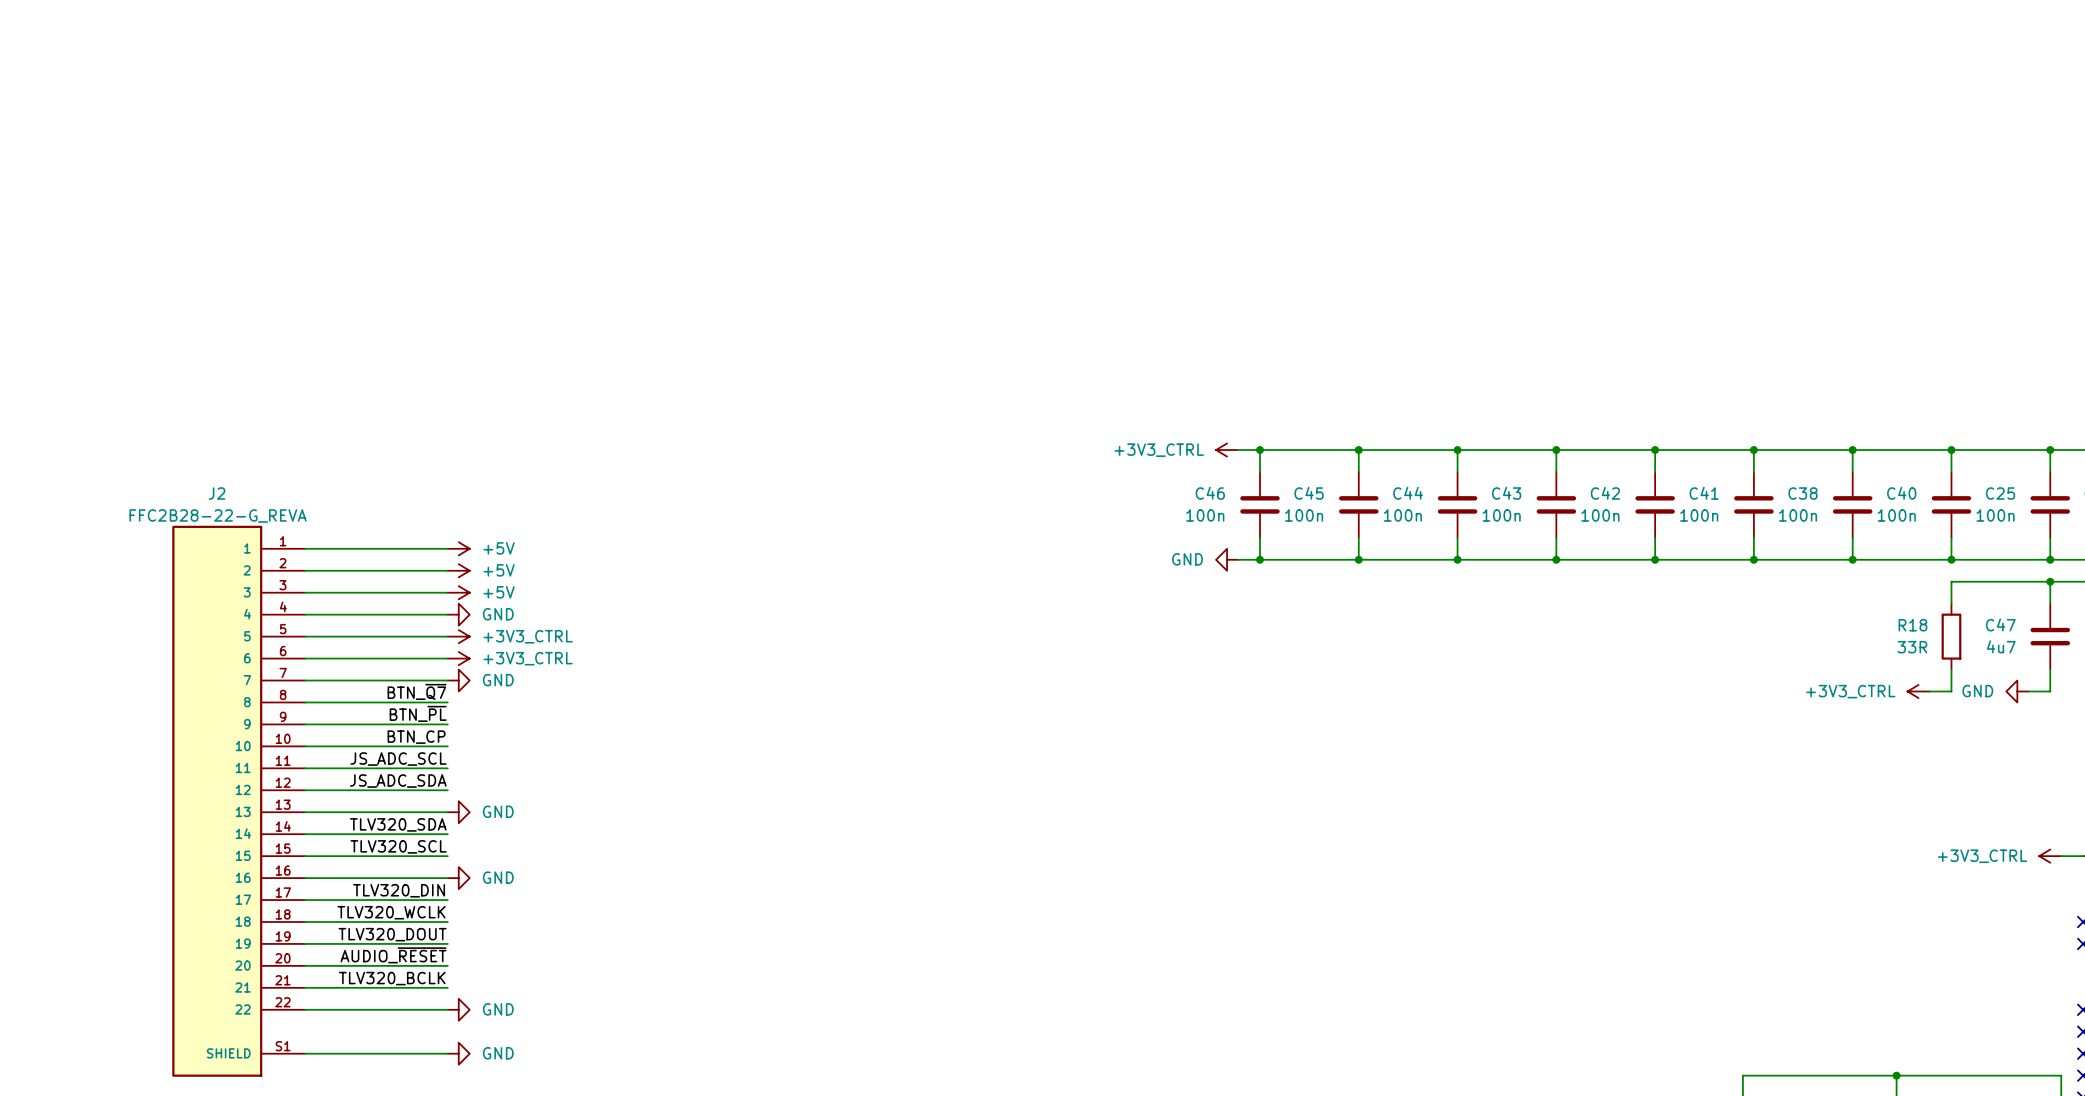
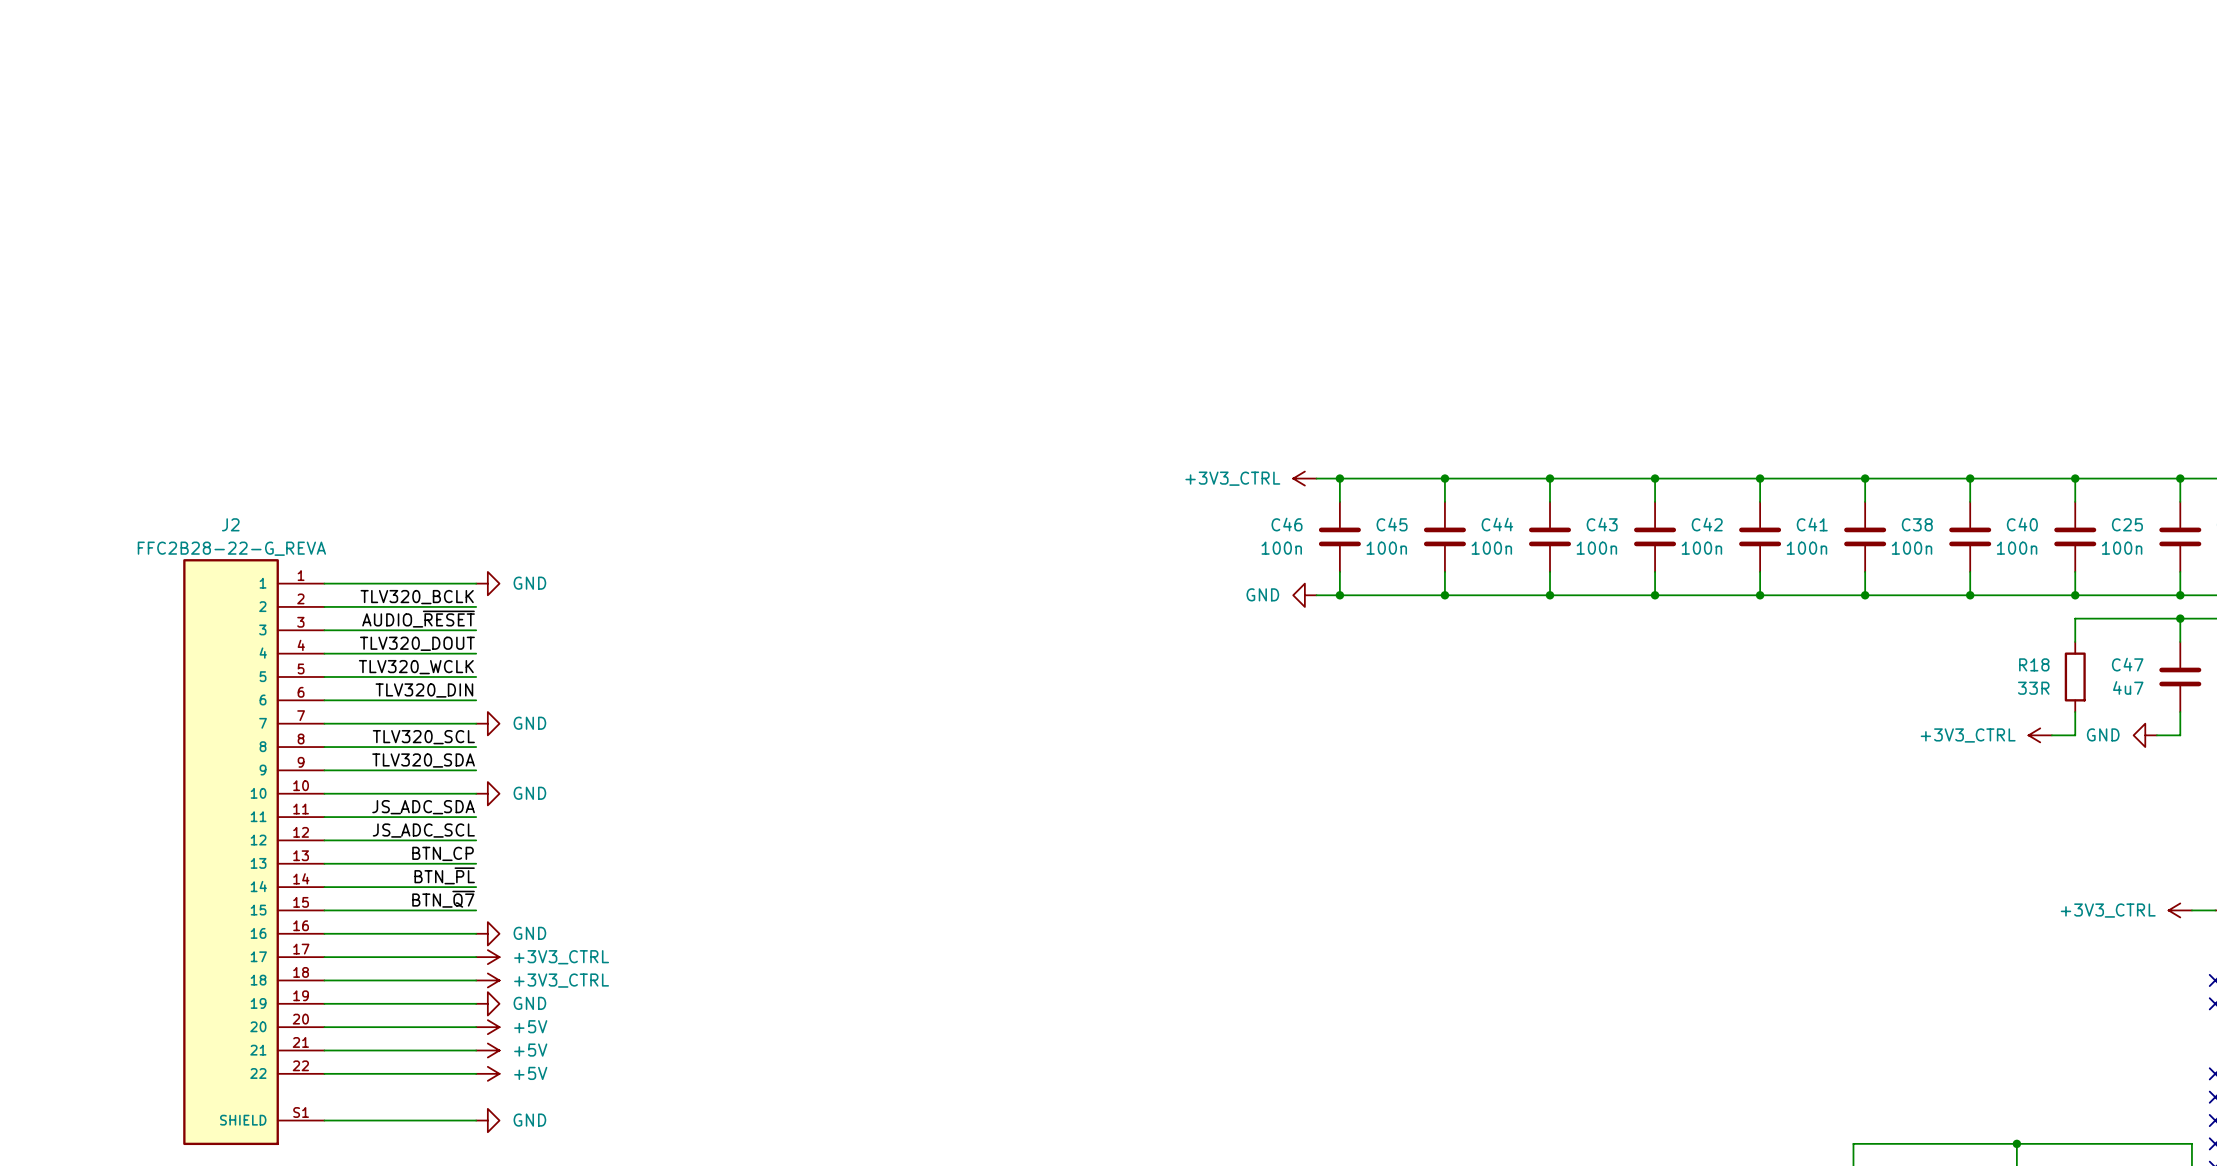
power symbol: +5V (458, 548) -> GND (487, 583)
label: none -> TLV320_BCLK (417, 597)
power symbol: +5V (458, 570) -> none
label: none -> AUDIO_~{RESET} (418, 619)
power symbol: +5V (458, 592) -> none
label: none -> TLV320_DOUT (417, 643)
power symbol: GND (458, 614) -> none
label: none -> TLV320_WCLK (416, 667)
power symbol: +3V3_CTRL (458, 636) -> none
label: none -> TLV320_DIN (424, 690)
power symbol: +3V3_CTRL (458, 658) -> none
label: BTN_~{Q7} (417, 691) -> TLV320_SCL (423, 737)
label: BTN_~{PL} (418, 713) -> TLV320_SDA (423, 760)
label position: BTN_CP (416, 737) -> BTN_CP (443, 853)
power symbol: none -> GND (487, 793)
label: JS_ADC_SCL (398, 759) -> JS_ADC_SDA (423, 807)
label: JS_ADC_SDA (398, 781) -> JS_ADC_SCL (423, 830)
power symbol: GND (458, 812) -> none
label: TLV320_SDA (398, 824) -> BTN_~{PL} (444, 875)
label: TLV320_SCL (398, 846) -> BTN_~{Q7} (443, 899)
label: TLV320_DIN (399, 890) -> none
power symbol: none -> +3V3_CTRL (487, 957)
label: TLV320_WCLK (391, 912) -> none
power symbol: none -> +3V3_CTRL (487, 980)
label: TLV320_DOUT (392, 934) -> none
power symbol: none -> GND (487, 1003)
label: AUDIO_~{RESET} (393, 955) -> none
power symbol: none -> +5V (487, 1027)
label: TLV320_BCLK (392, 978) -> none
power symbol: none -> +5V (487, 1050)
power symbol: GND (458, 1009) -> +5V (487, 1073)

